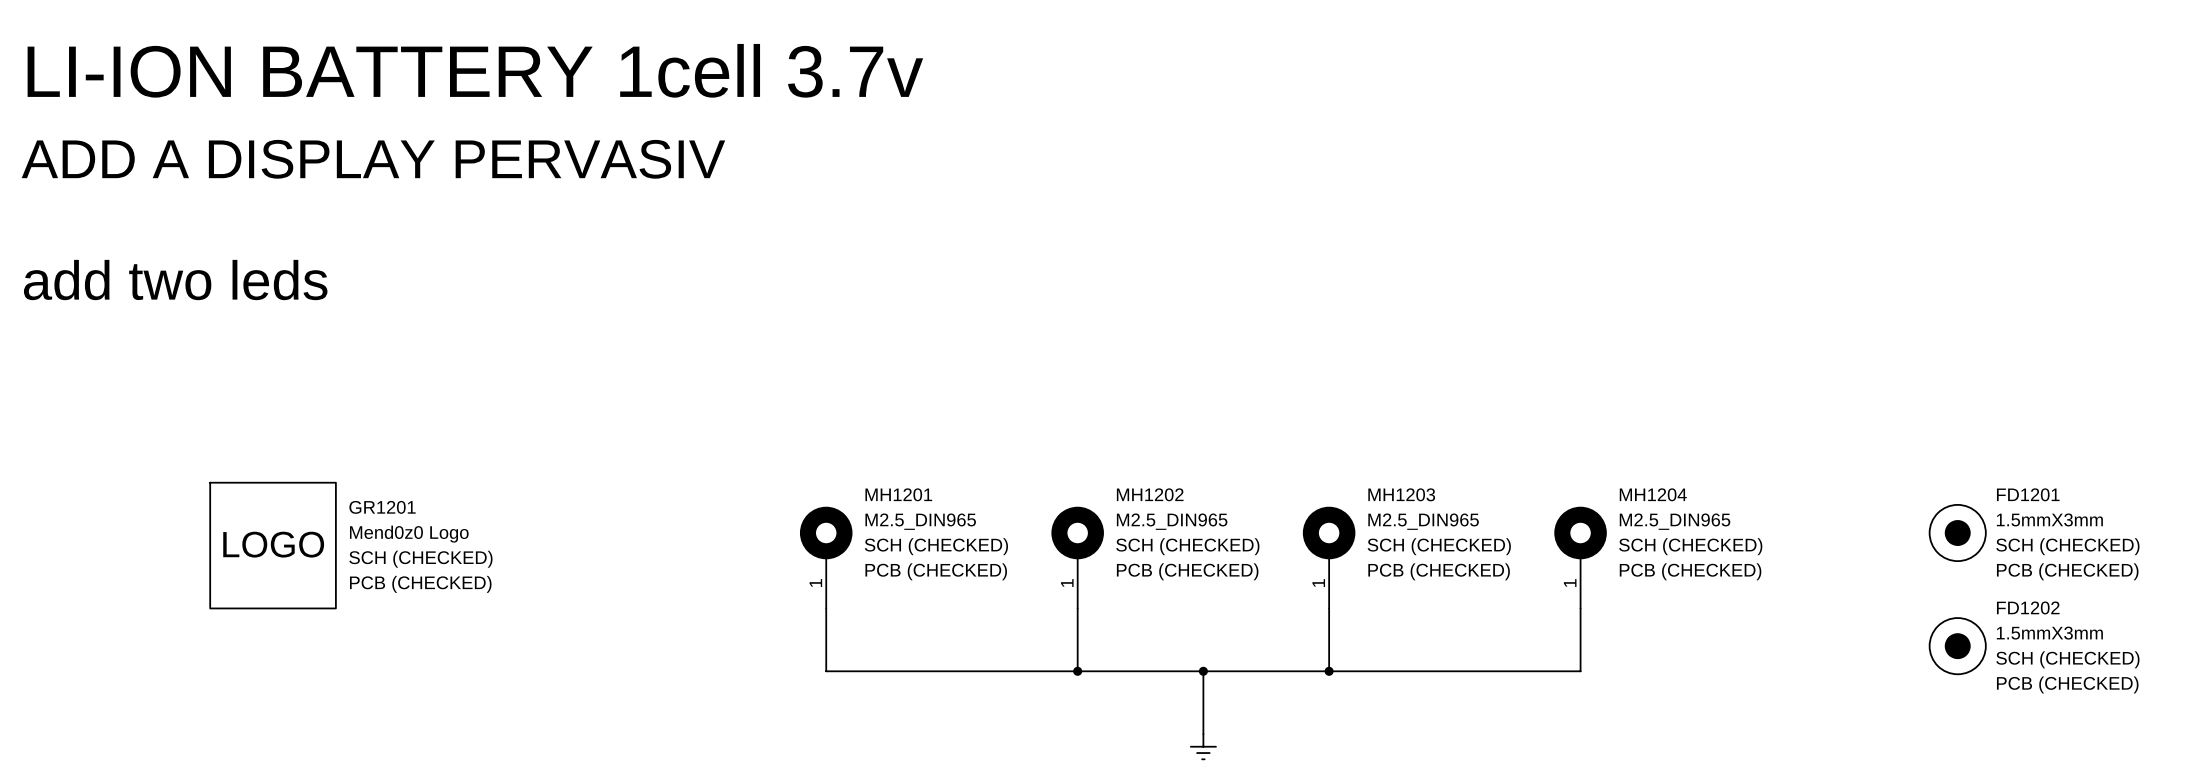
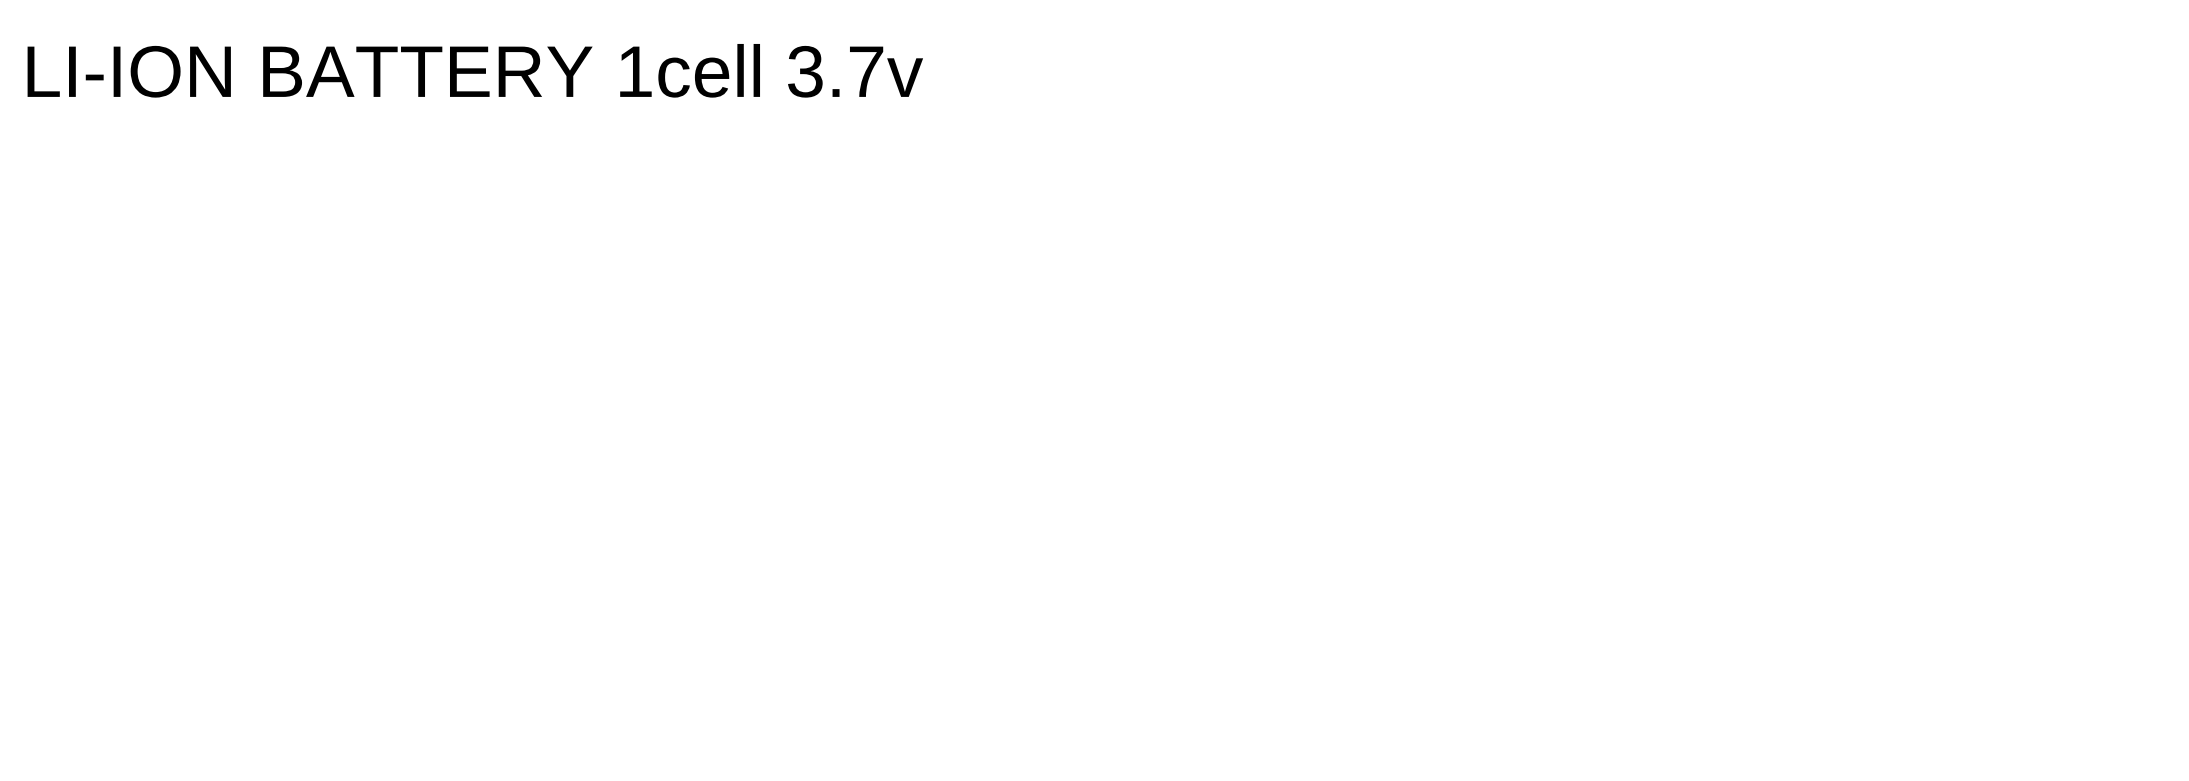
text: ADD A DISPLAY PERVASIV (373, 159) -> none
text: add two leds (175, 280) -> none
FD1201: 1.5mmX3mm (1957, 533) -> none
GR1201: Mend0z0 Logo (273, 545) -> none
MH1201: M2.5_DIN965 (826, 558) -> none
MH1202: M2.5_DIN965 (1077, 558) -> none
MH1203: M2.5_DIN965 (1329, 558) -> none
MH1204: M2.5_DIN965 (1580, 558) -> none
wire: (826, 608) (826, 671) (1580, 671) (1580, 608) -> none
wire: (1077, 608) (1077, 671) -> none
wire: (1329, 608) (1329, 671) -> none
FD1202: 1.5mmX3mm (1957, 646) -> none
junction: (1077, 671) -> none
wire: (1203, 671) (1203, 734) -> none
junction: (1203, 671) -> none
junction: (1329, 671) -> none
power symbol: (1203, 746) -> none

